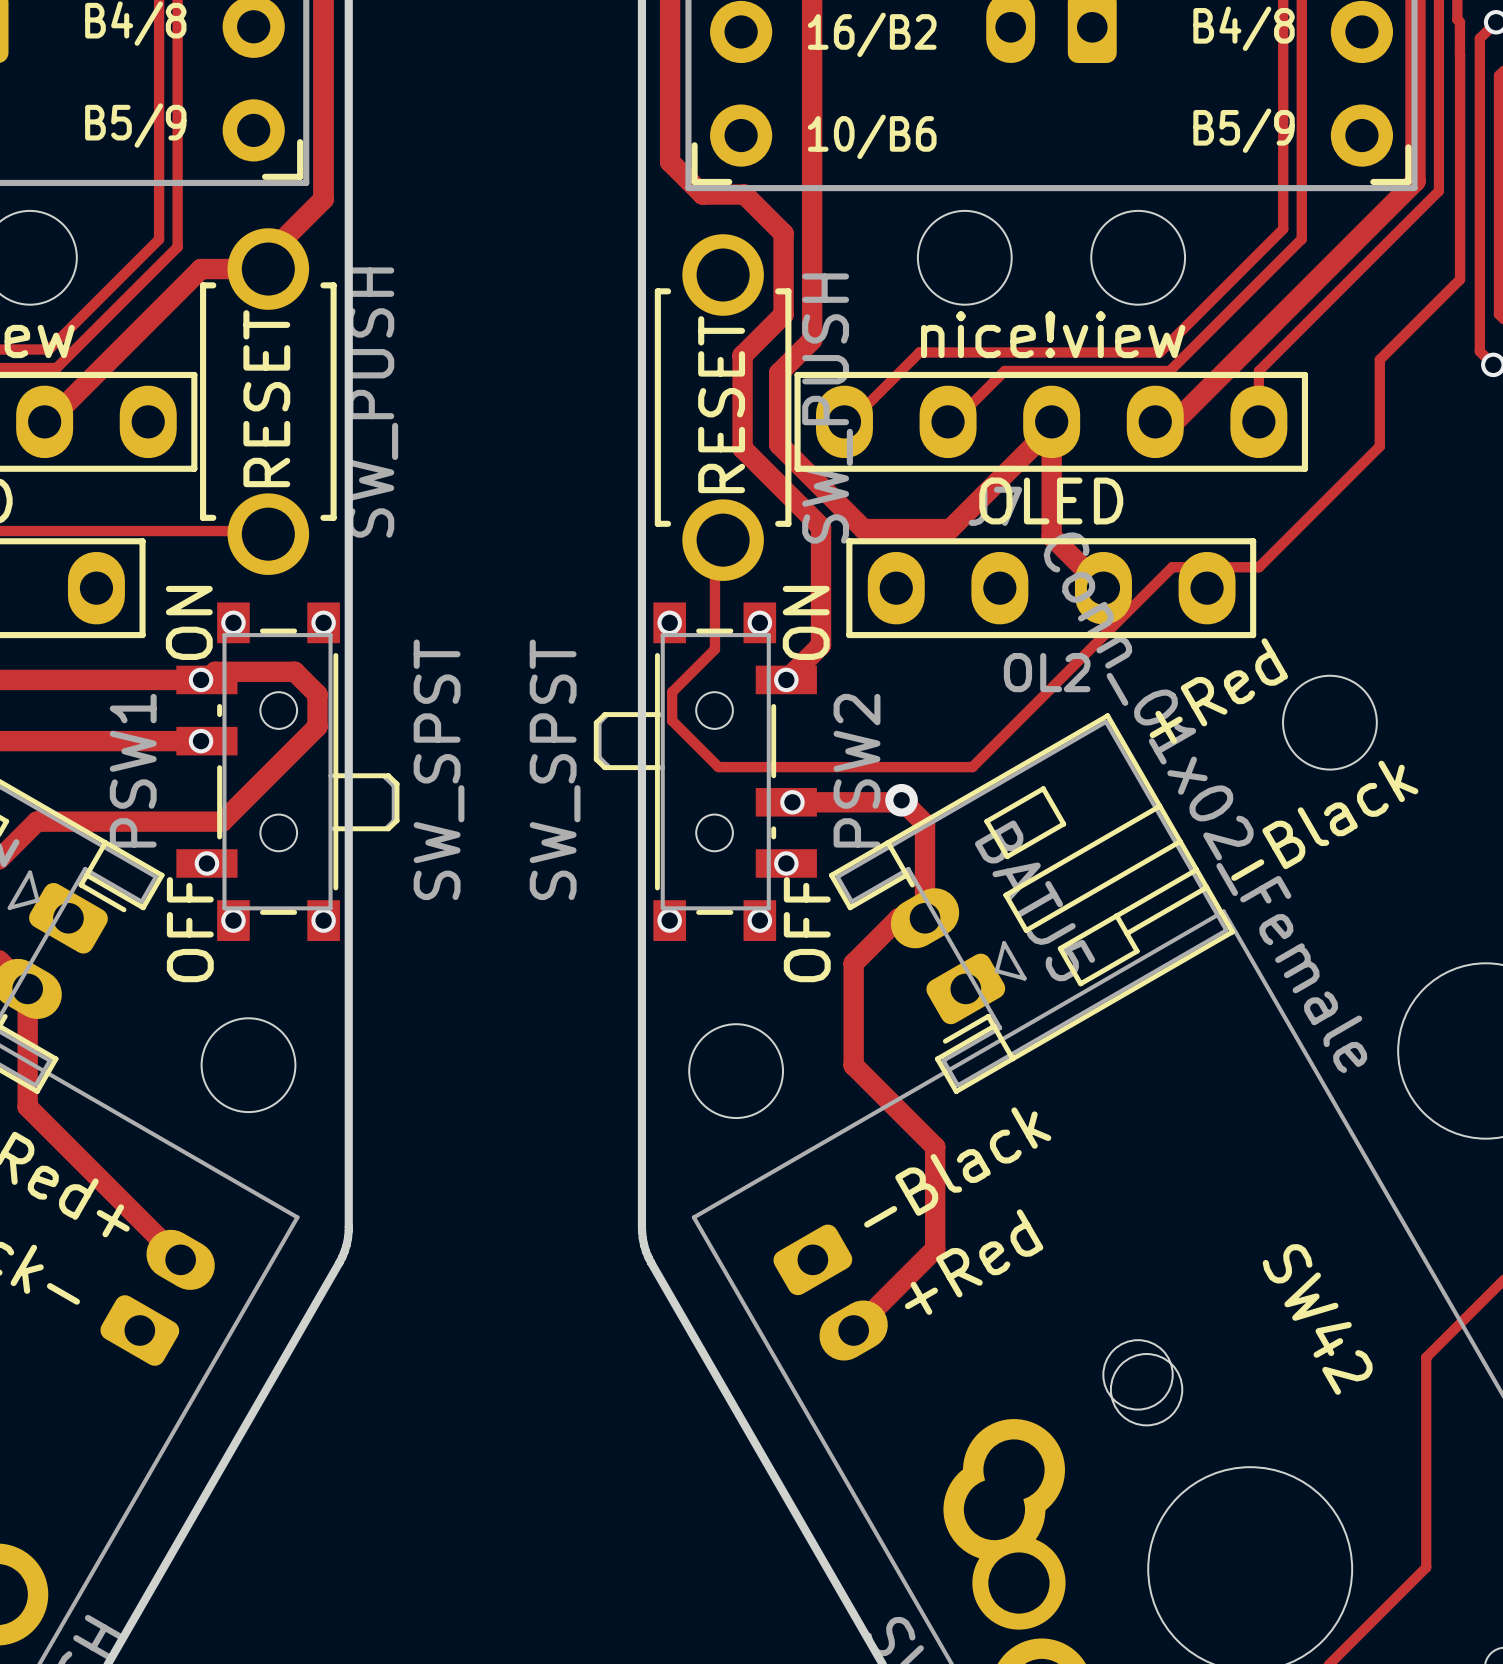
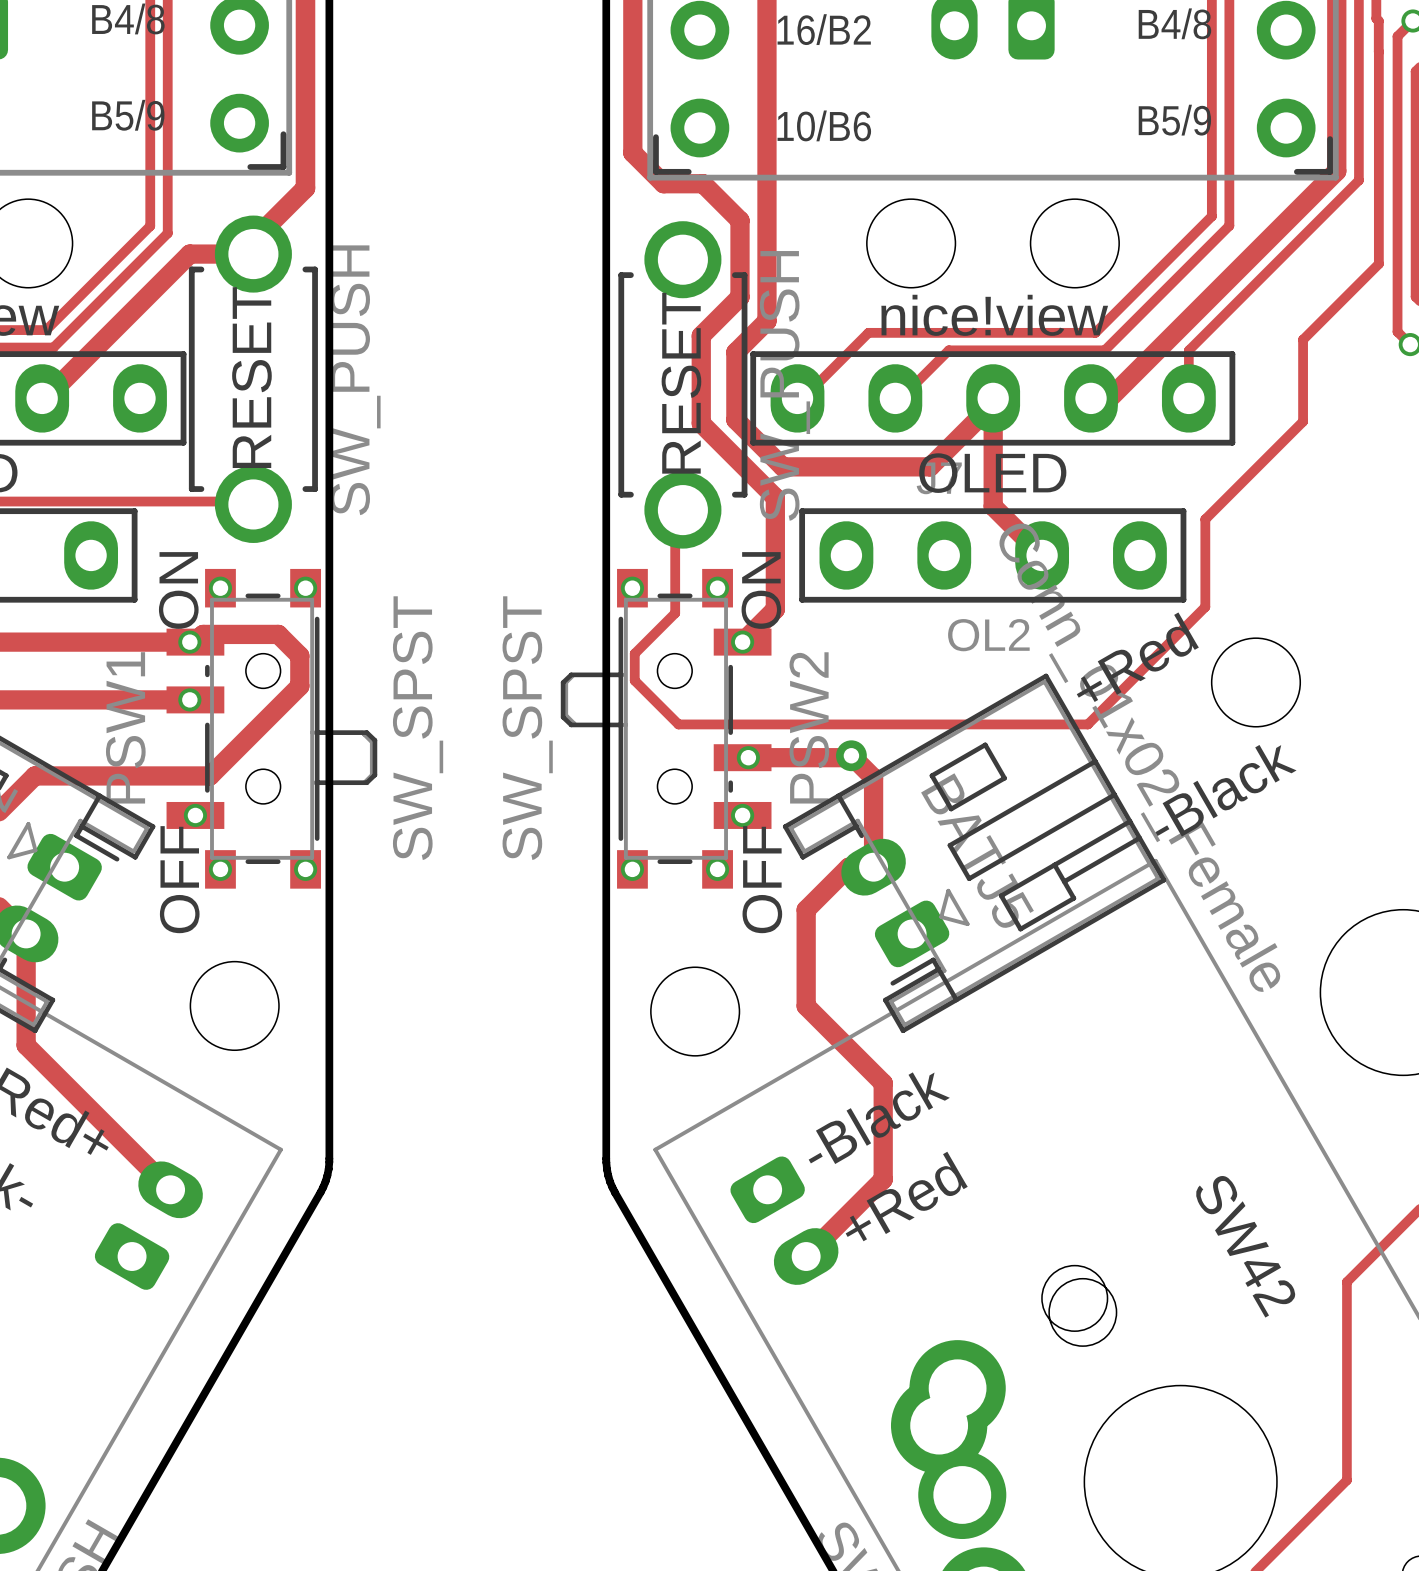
track: (828, 494) (863, 529) (950, 529) (984, 494) -> (782, 466) (930, 466)
track: (1276, 549) (1258, 567) (1172, 567) (972, 767) -> (1205, 519) (1205, 606) (1087, 724) (918, 724)

